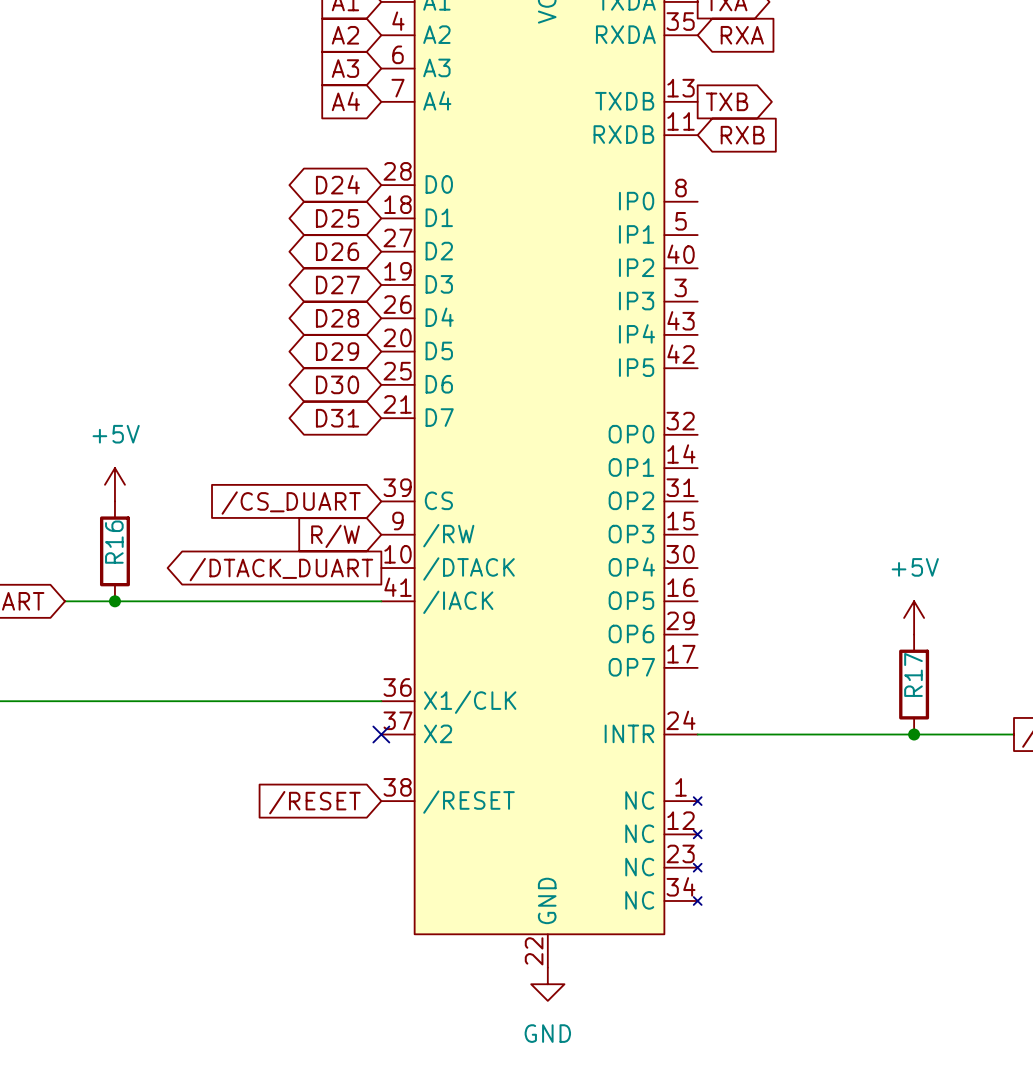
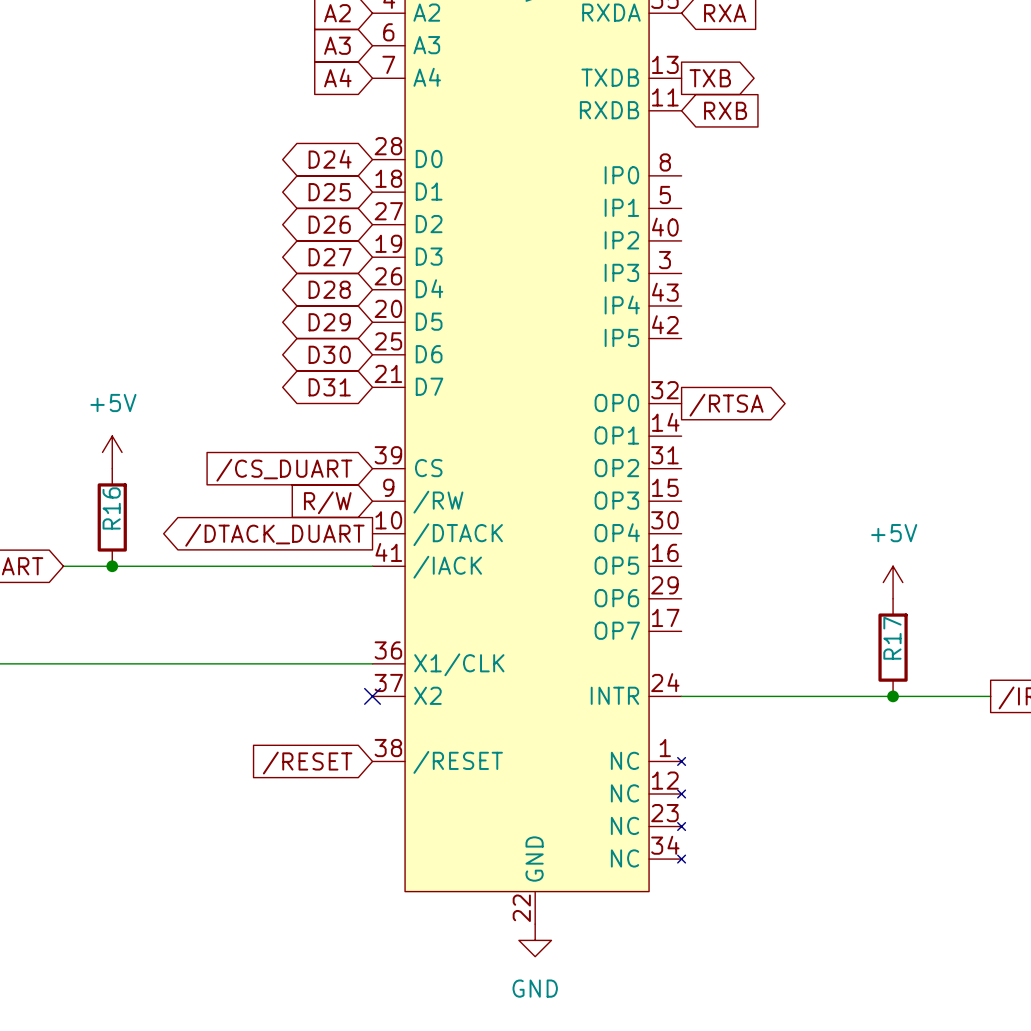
global label: none -> /RTSA (726, 405)

